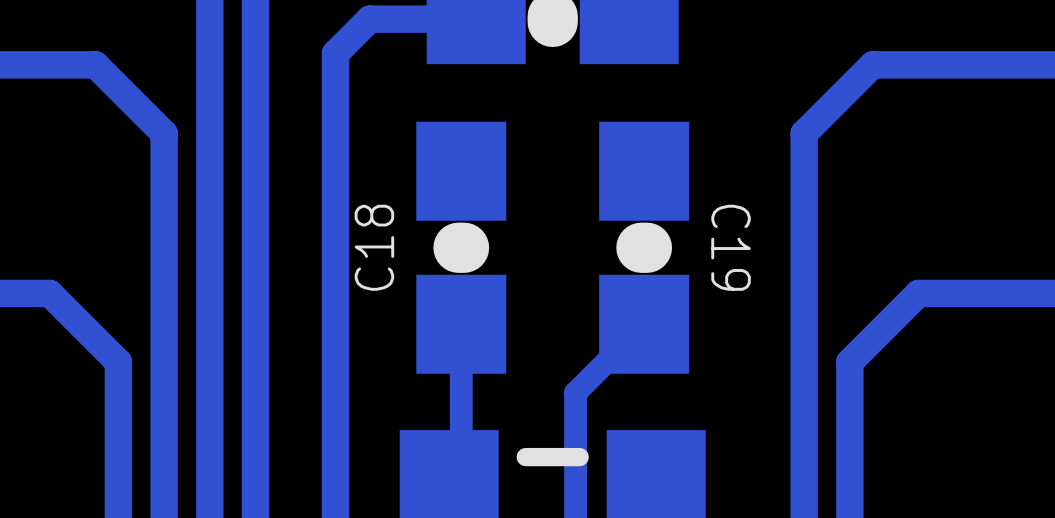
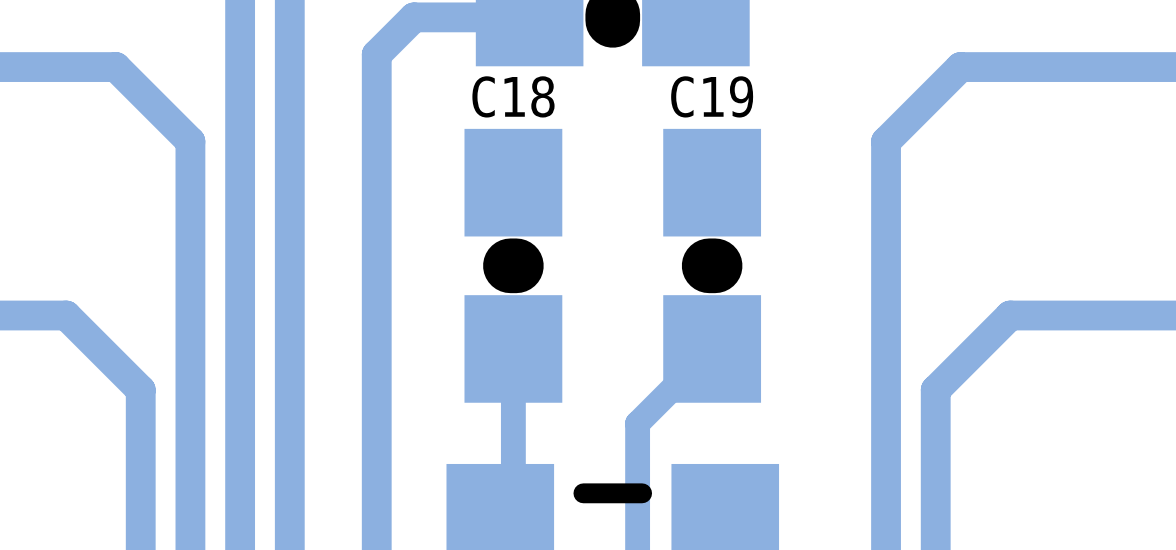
C18 name rotation: 0° (374, 247) -> 90° clockwise (513, 96)
C18 name position: C18 (374, 247) -> C18 (513, 96)
C19 name rotation: 0° (731, 247) -> 90° counterclockwise (712, 96)
C19 name position: C19 (731, 247) -> C19 (712, 96)

